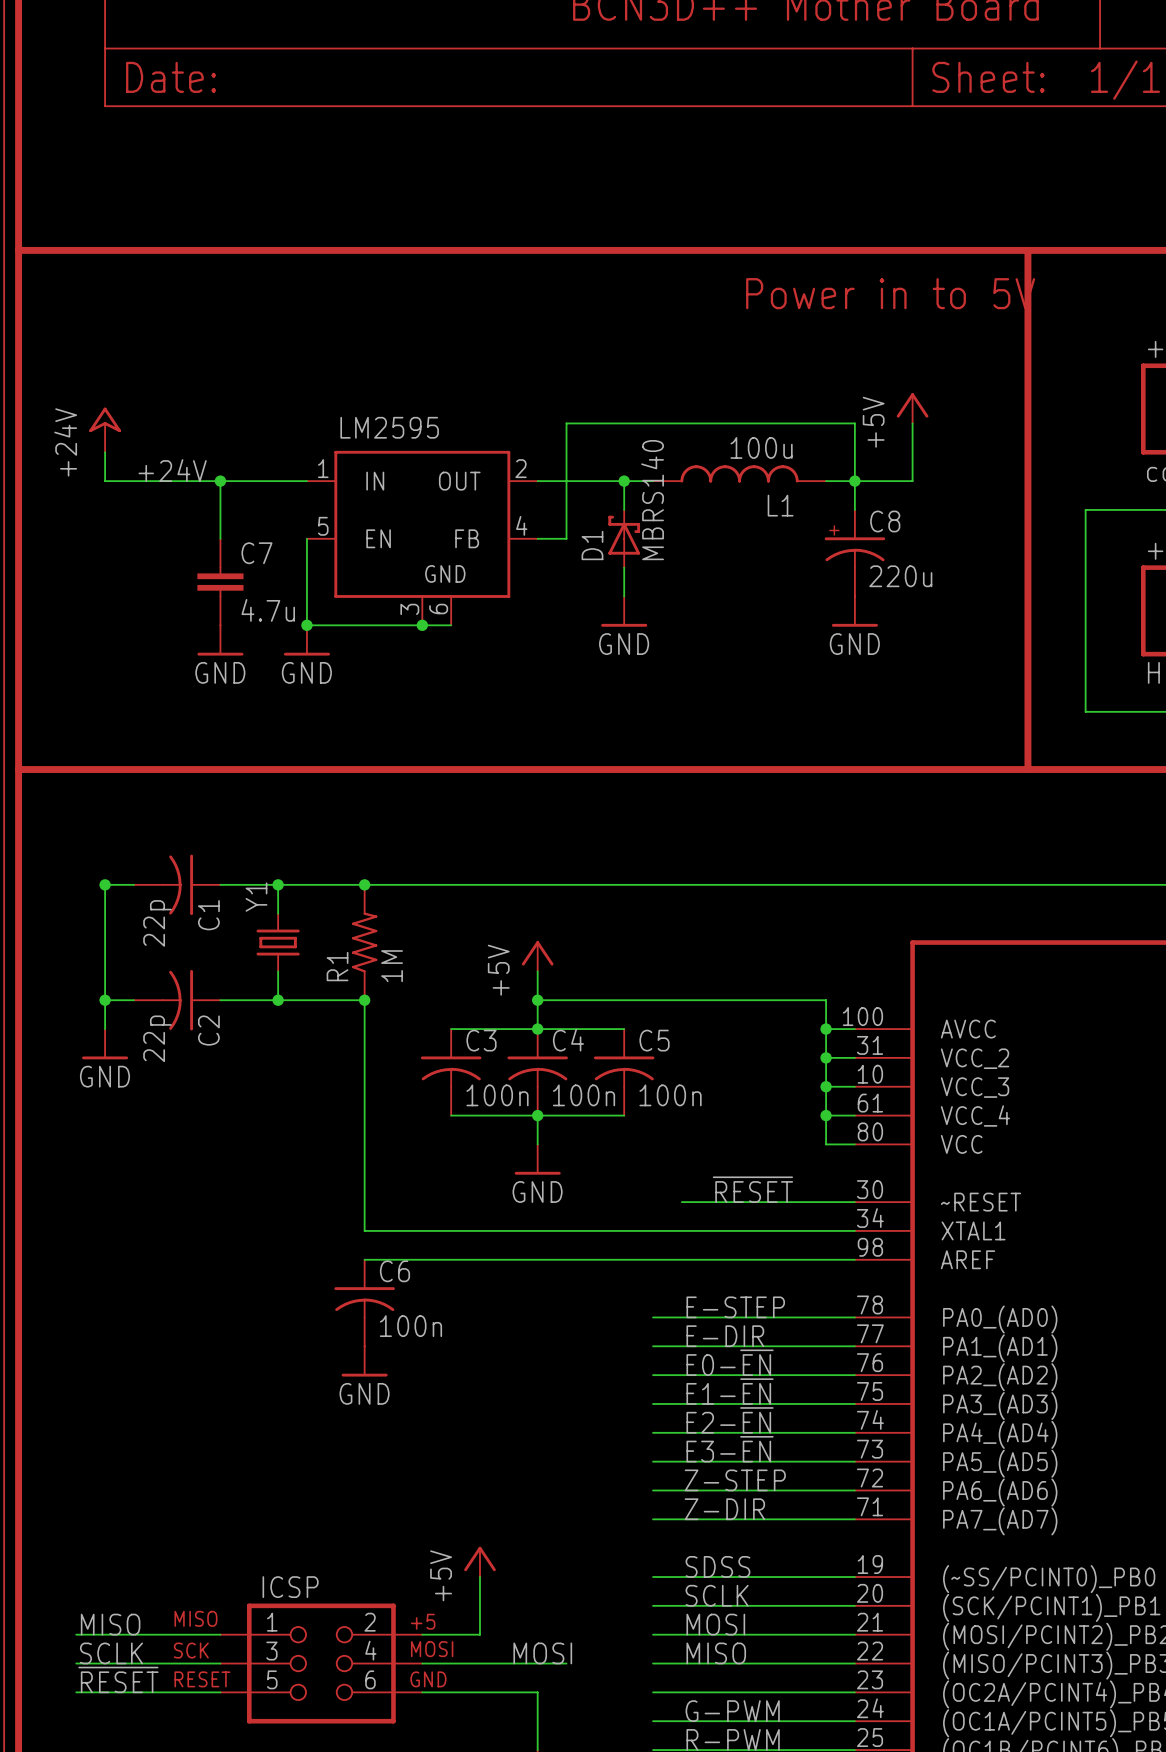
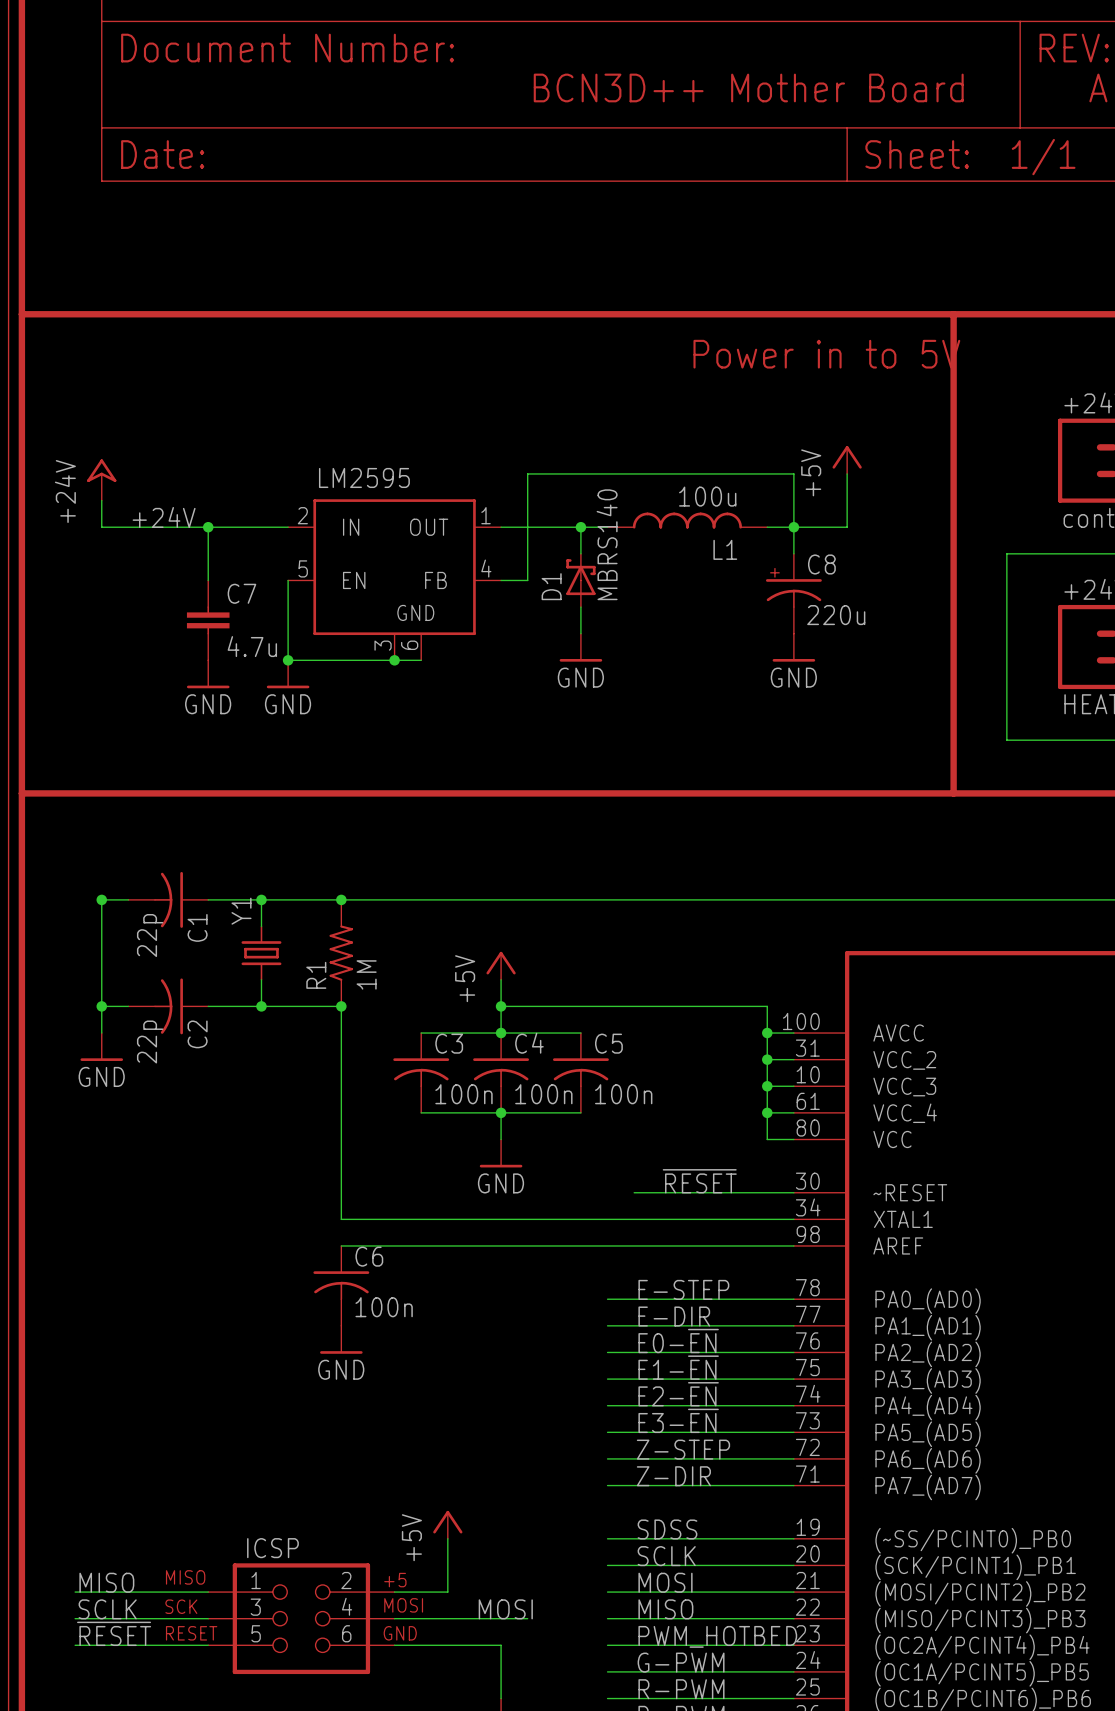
LM2595 pin number: 1 (323, 468) -> 2 (302, 515)
LM2595 pin number: 2 (520, 468) -> 1 (486, 515)
label: none -> PWM_HOTBED (717, 1636)

